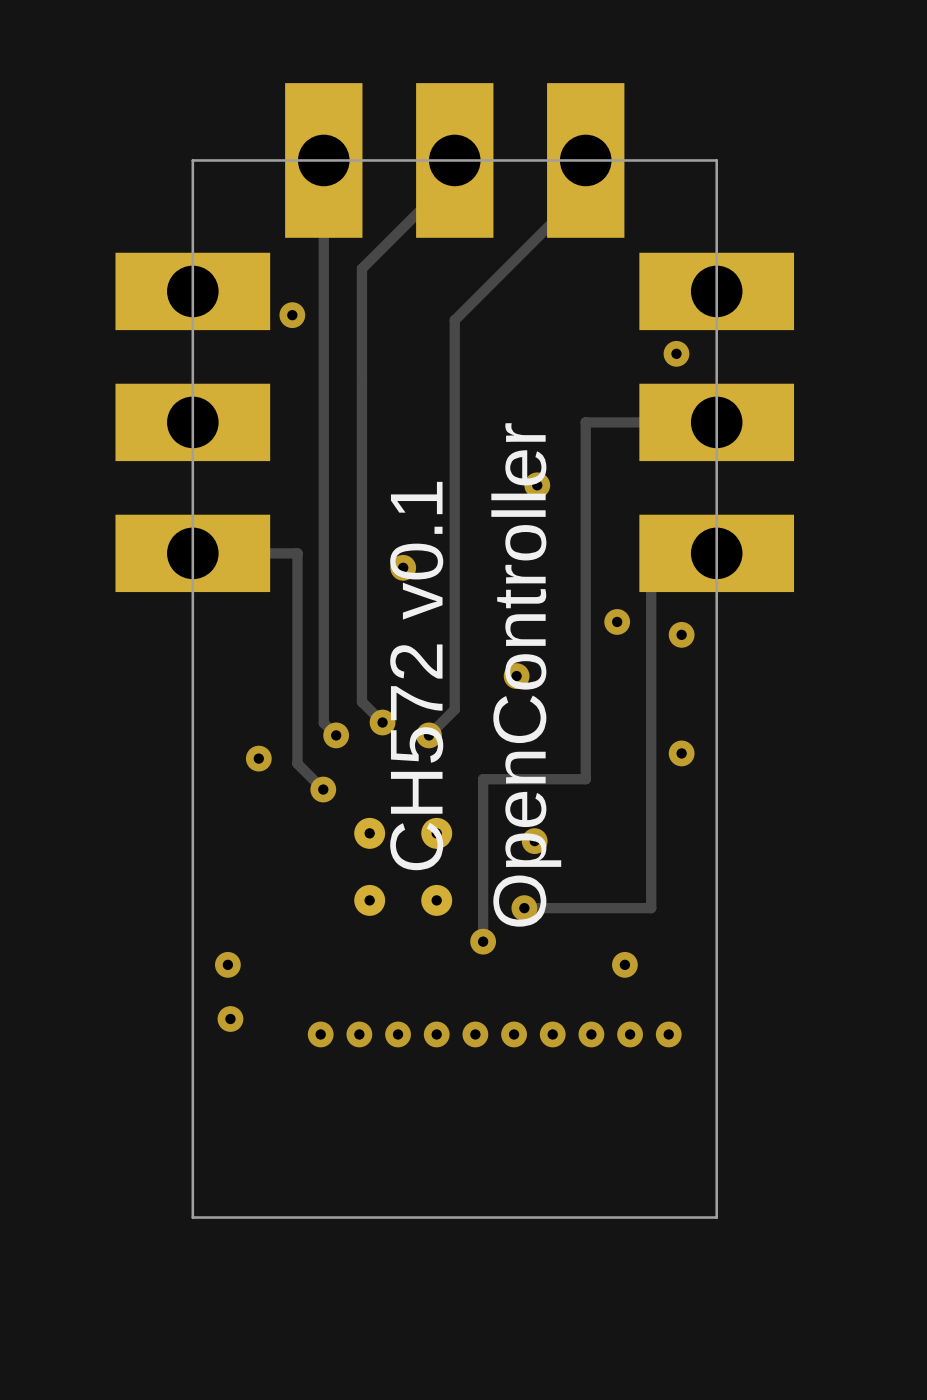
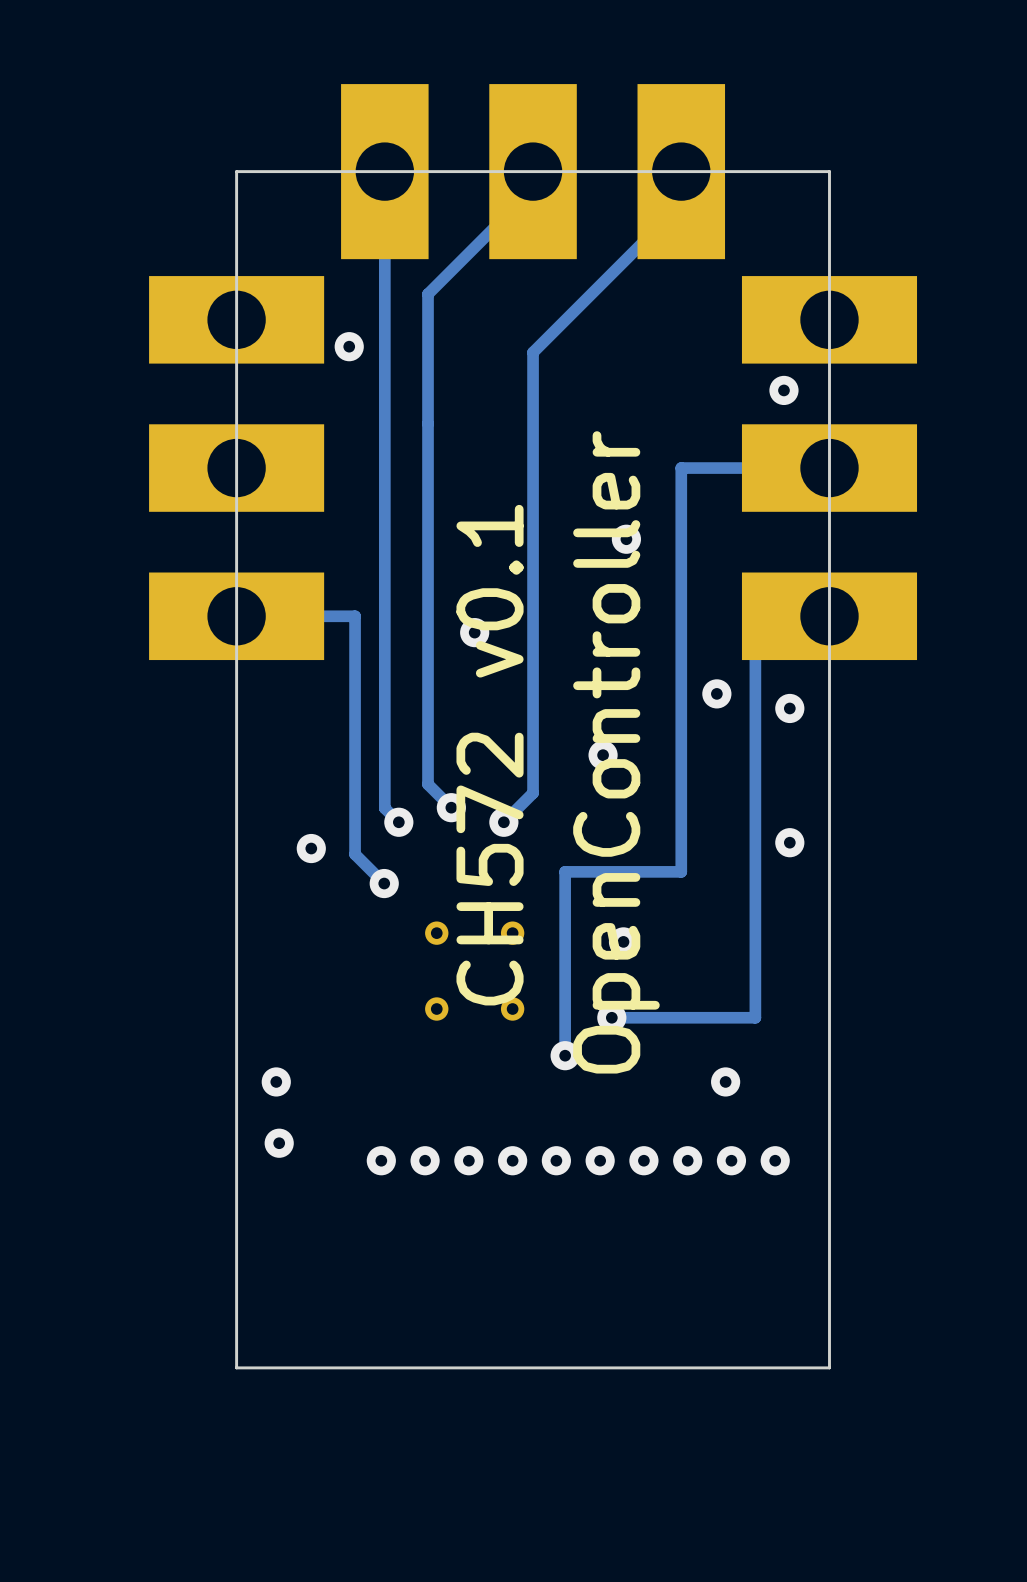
part footprint: [354, 817, 453, 916] -> [425, 921, 525, 1021]

